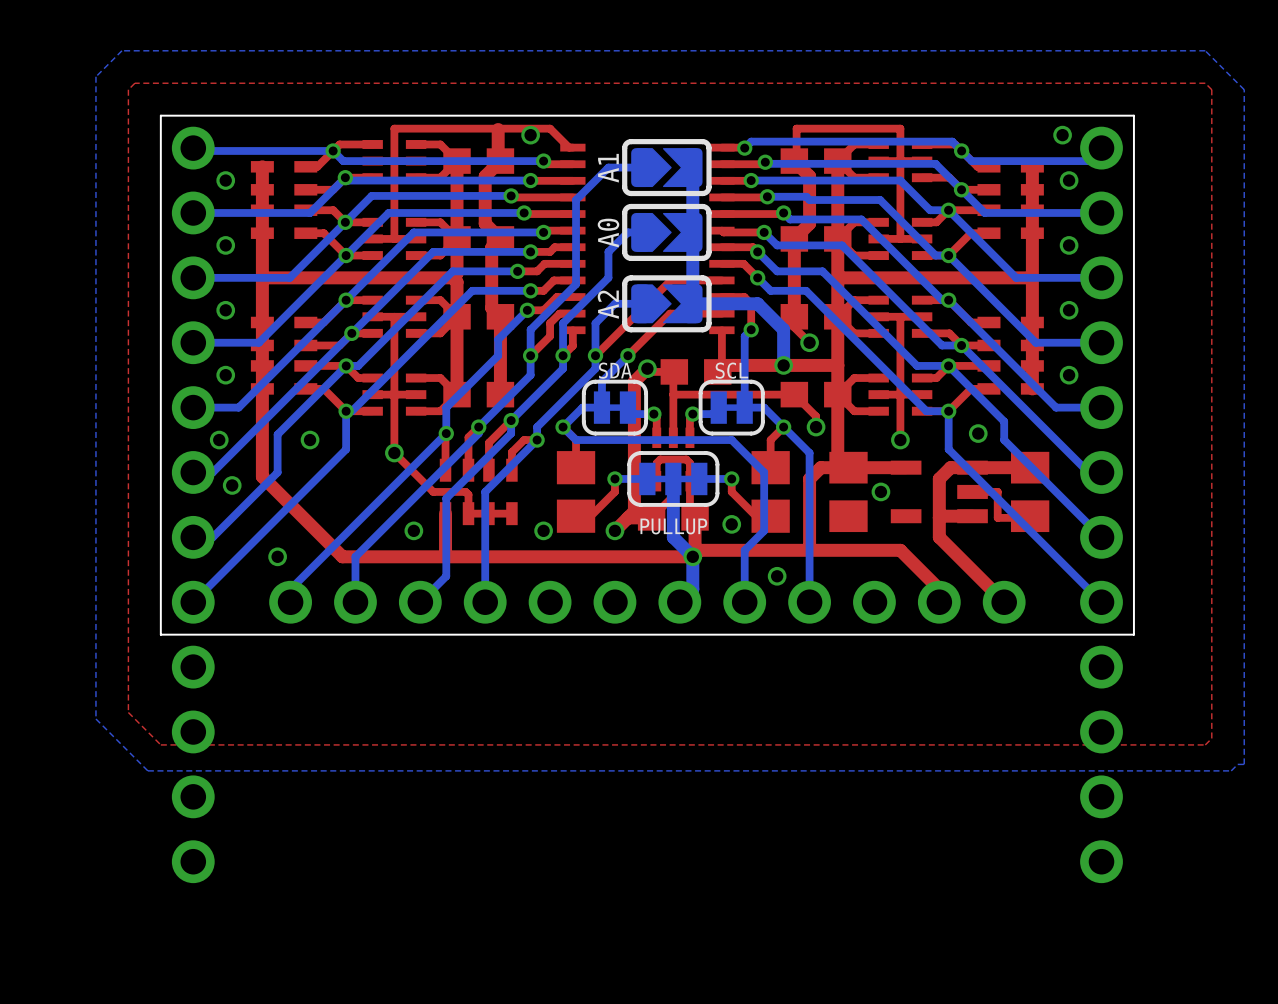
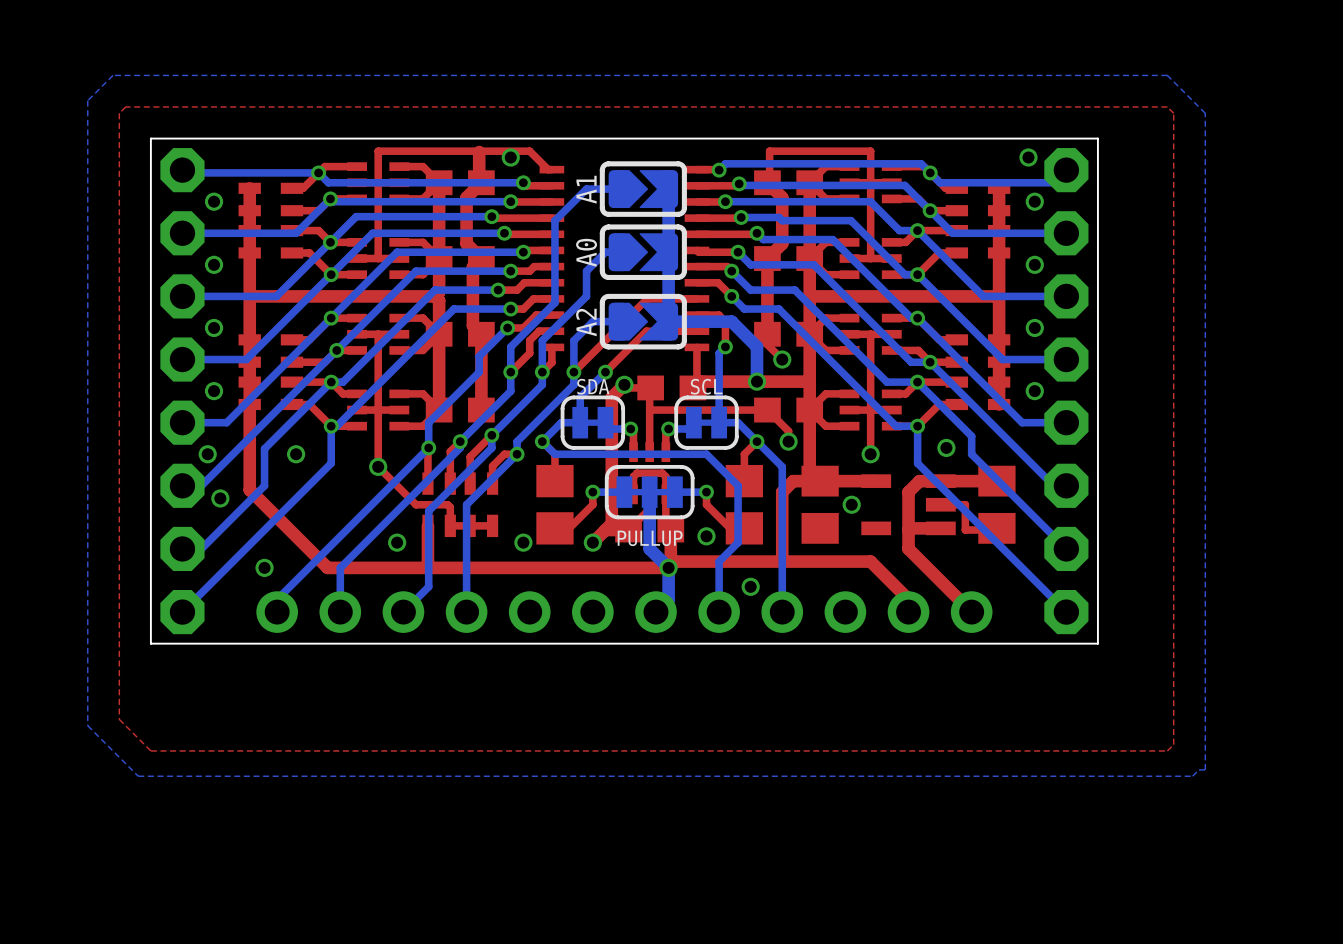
part: none -> (182, 391)
part: none -> (1066, 391)
part: (193, 504) -> none
part: (1101, 504) -> none

